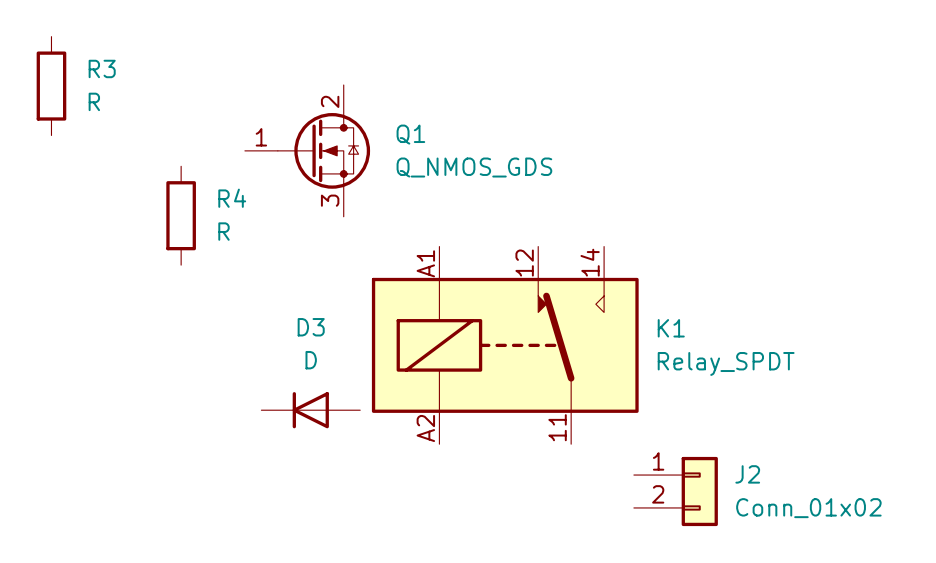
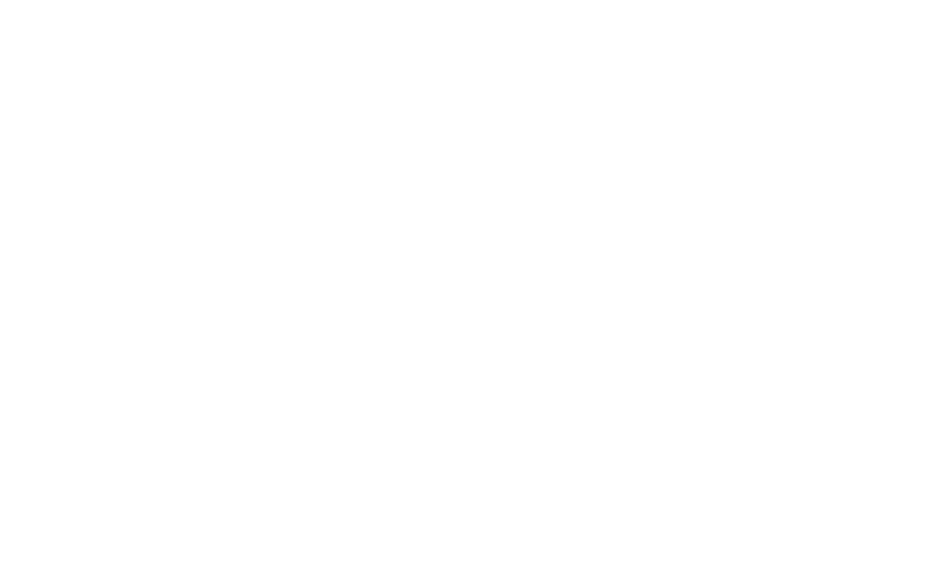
R3: R (51, 86) -> none
Q1: Q_NMOS_GDS (307, 150) -> none
R4: R (181, 215) -> none
K1: Relay_SPDT (505, 345) -> none
D3: D (310, 410) -> none
J2: Conn_01x02 (675, 491) -> none

